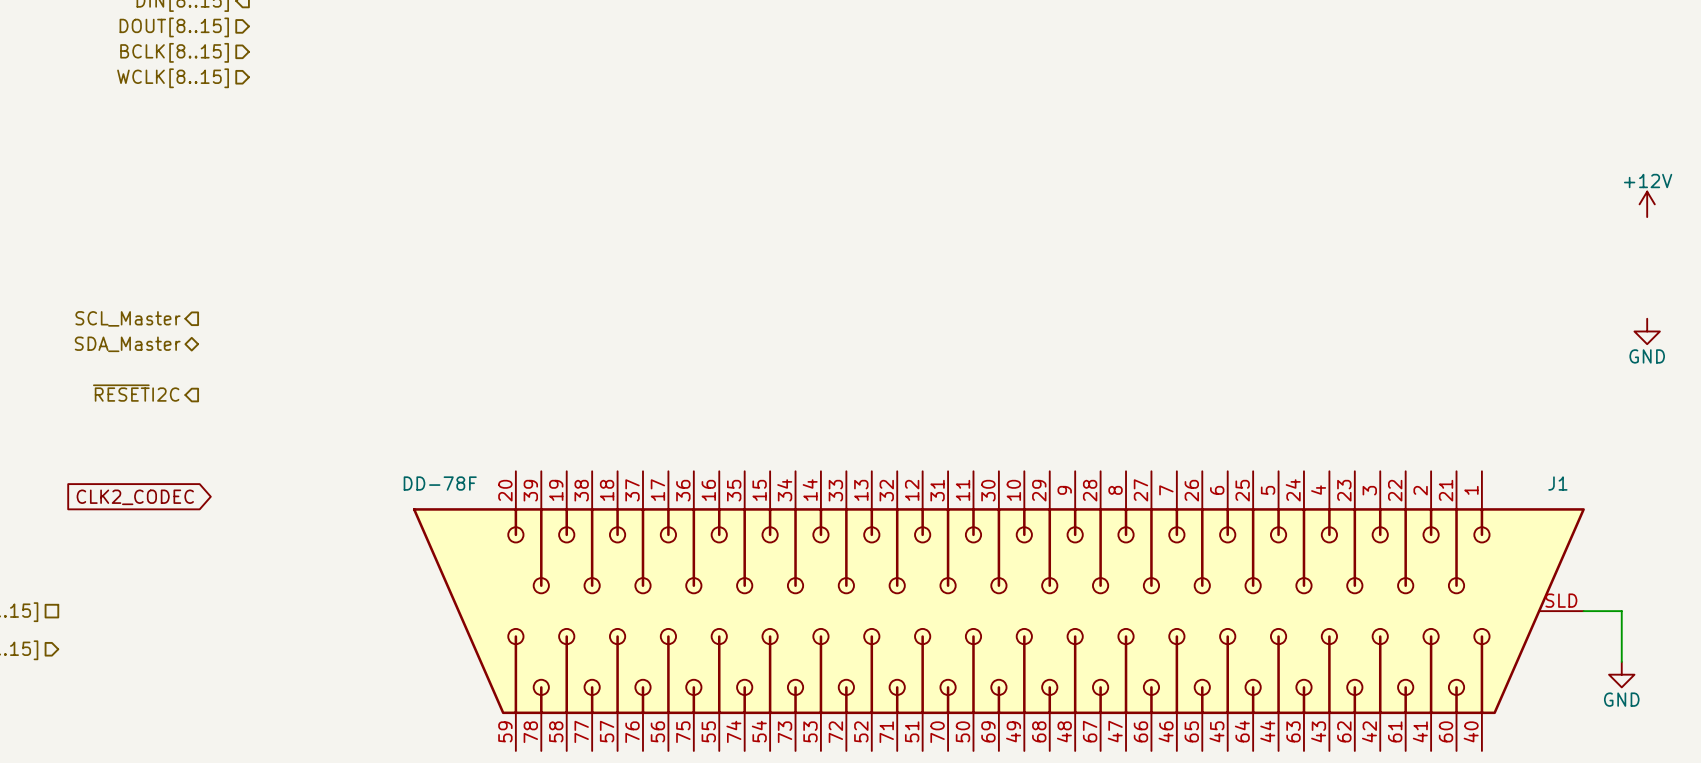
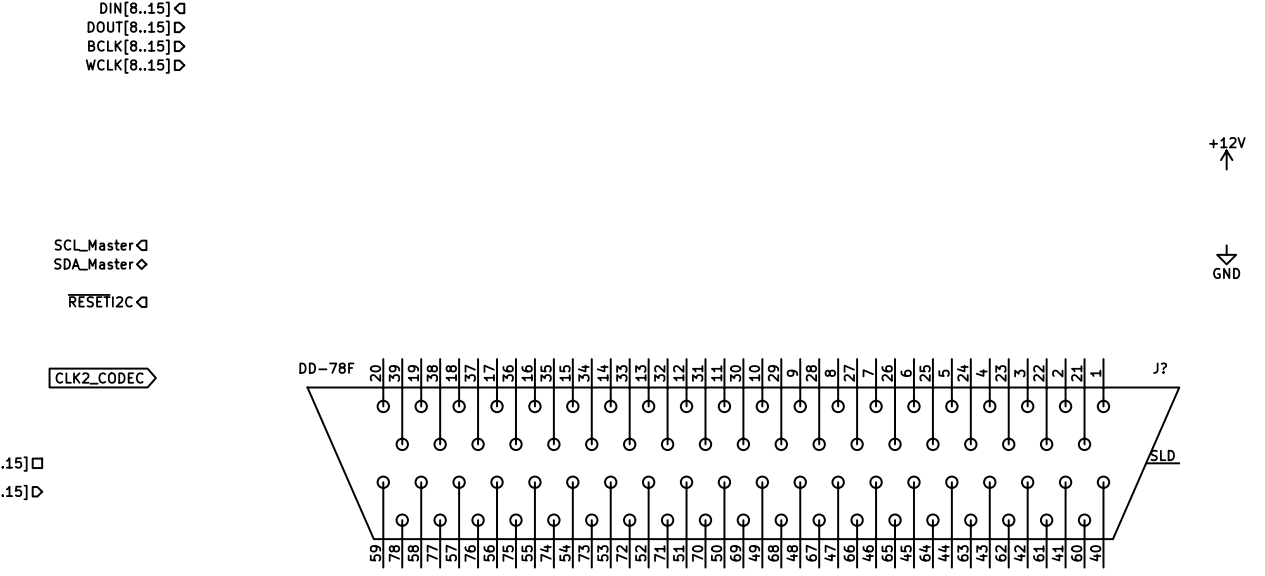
J1 name: J1 (1557, 483) -> J? (1160, 368)
wire: (1583, 611) (1621, 611) (1621, 661) -> none
power symbol: GND (1621, 674) -> none

